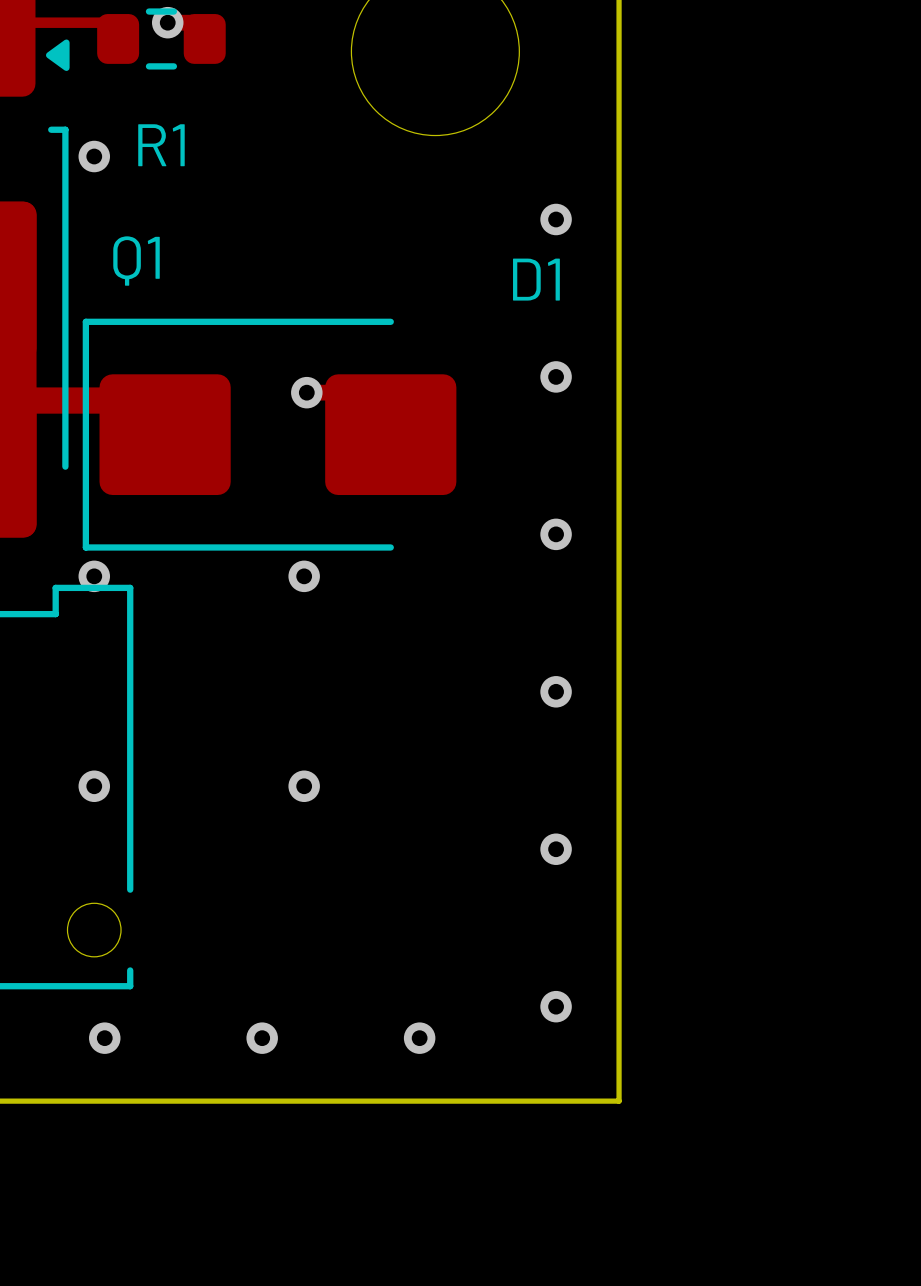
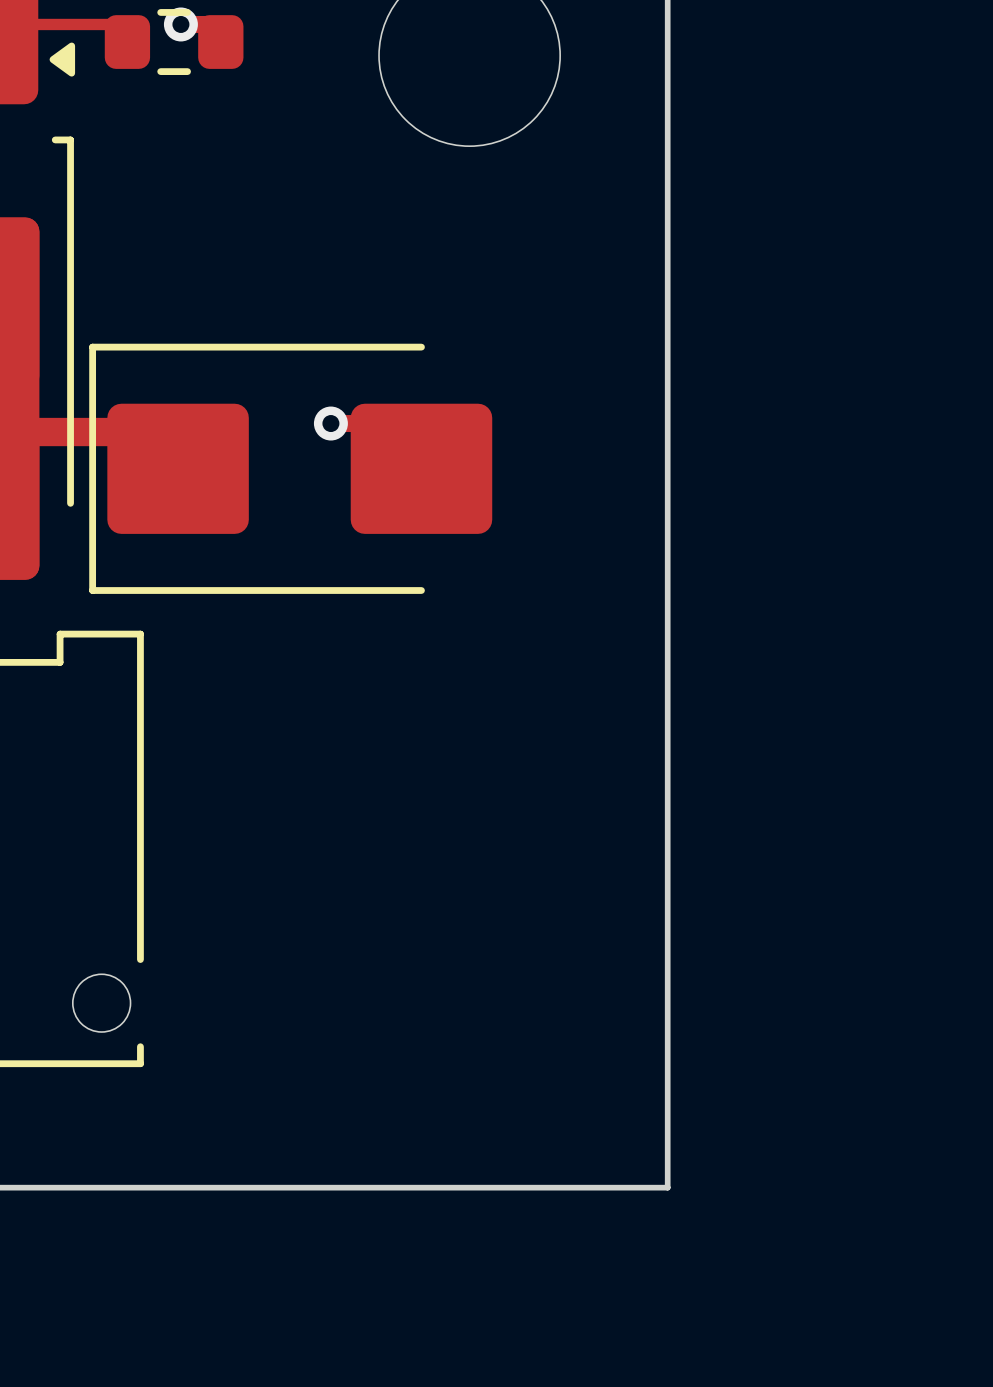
R1 name: R1 (161, 145) -> none
via: (94, 156) -> none
via: (556, 219) -> none
Q1 name: Q1 (136, 261) -> none
D1 name: D1 (536, 279) -> none
via: (556, 376) -> none
via: (556, 534) -> none
via: (94, 576) -> none
via: (304, 576) -> none
via: (556, 691) -> none
via: (94, 786) -> none
via: (304, 786) -> none
via: (556, 849) -> none
via: (556, 1006) -> none
via: (104, 1038) -> none
via: (262, 1038) -> none
via: (419, 1038) -> none

